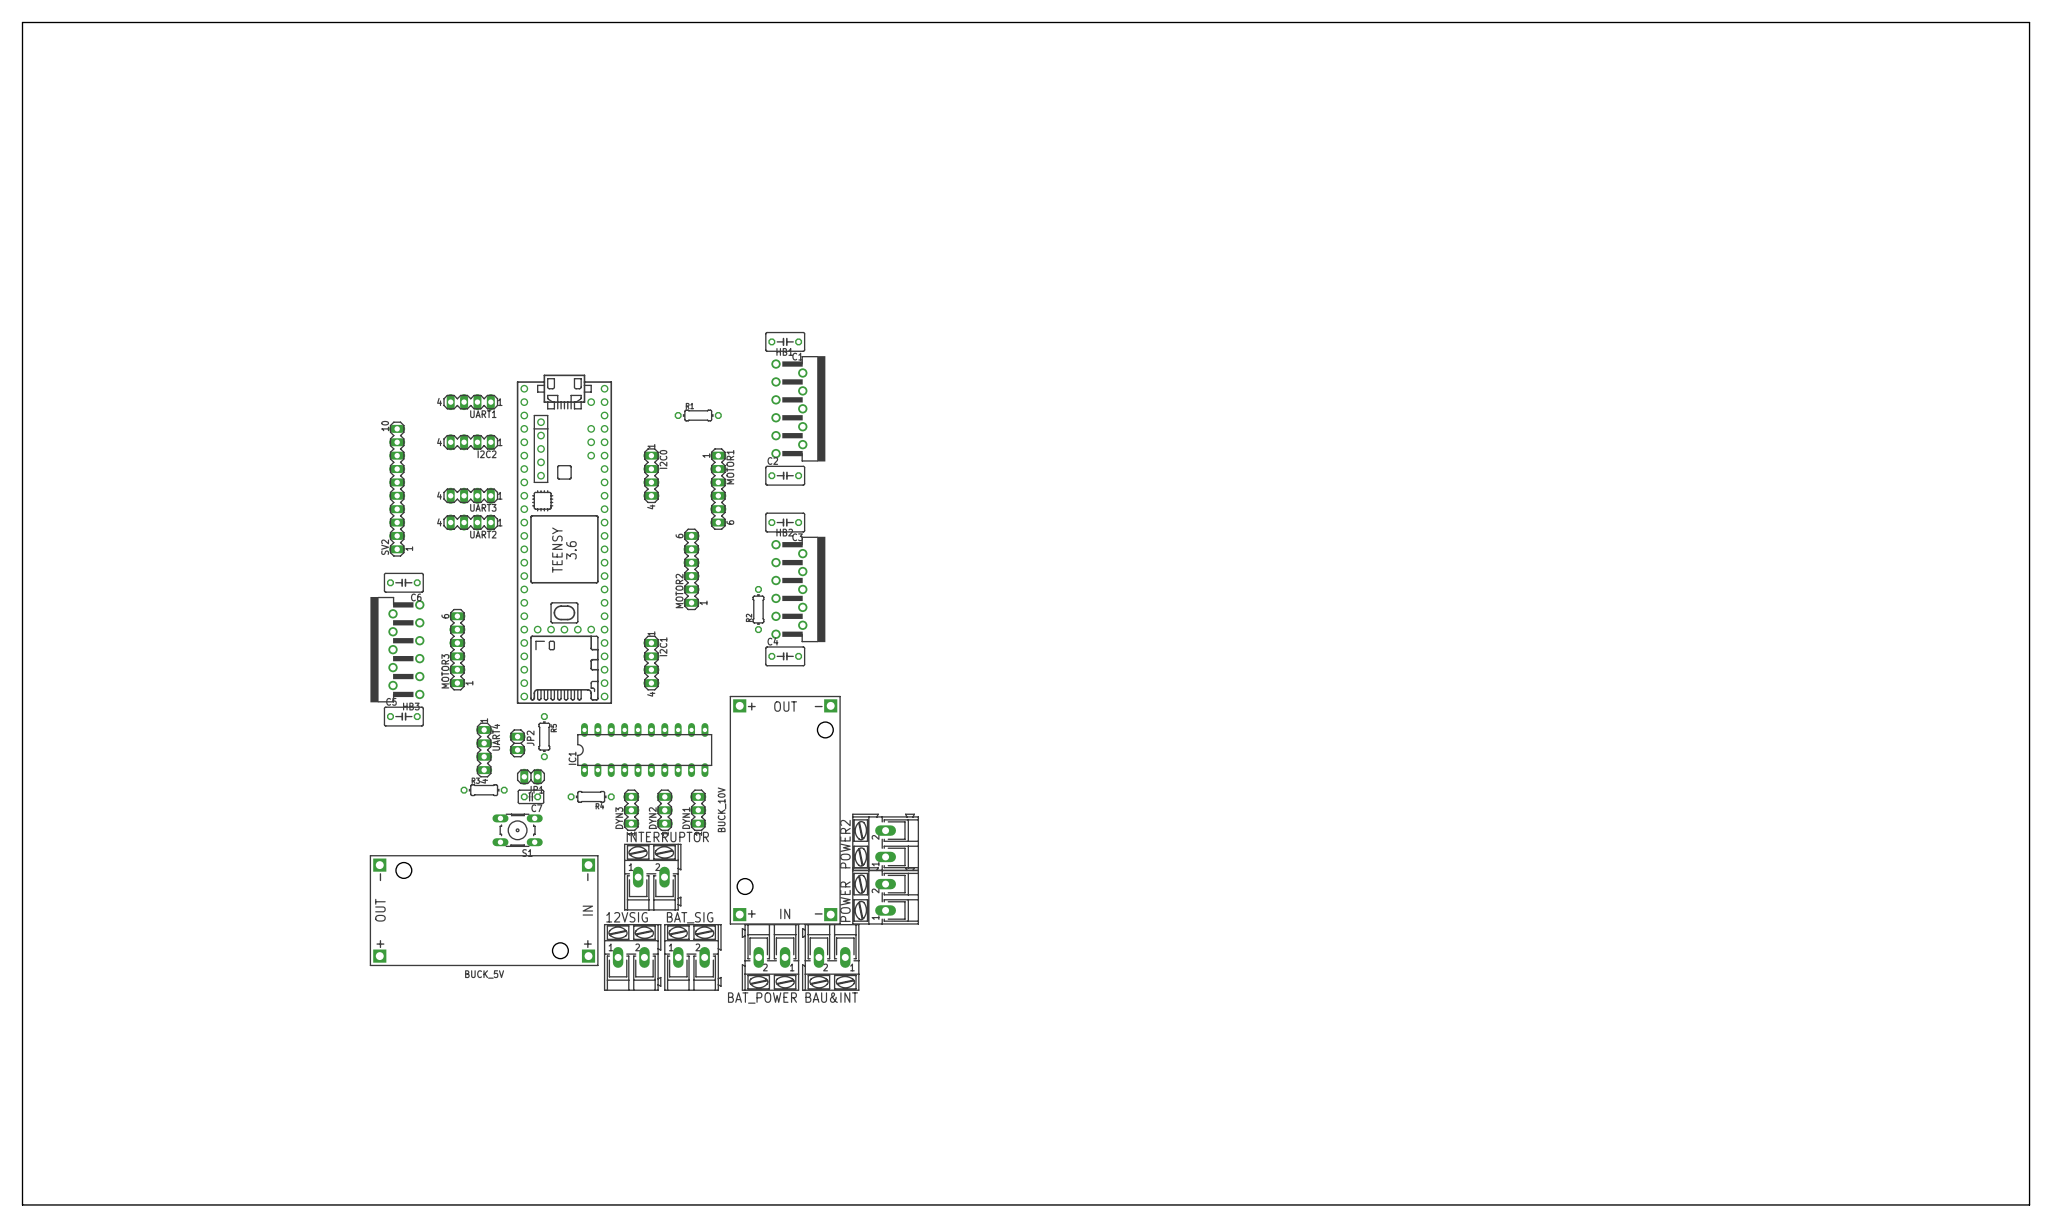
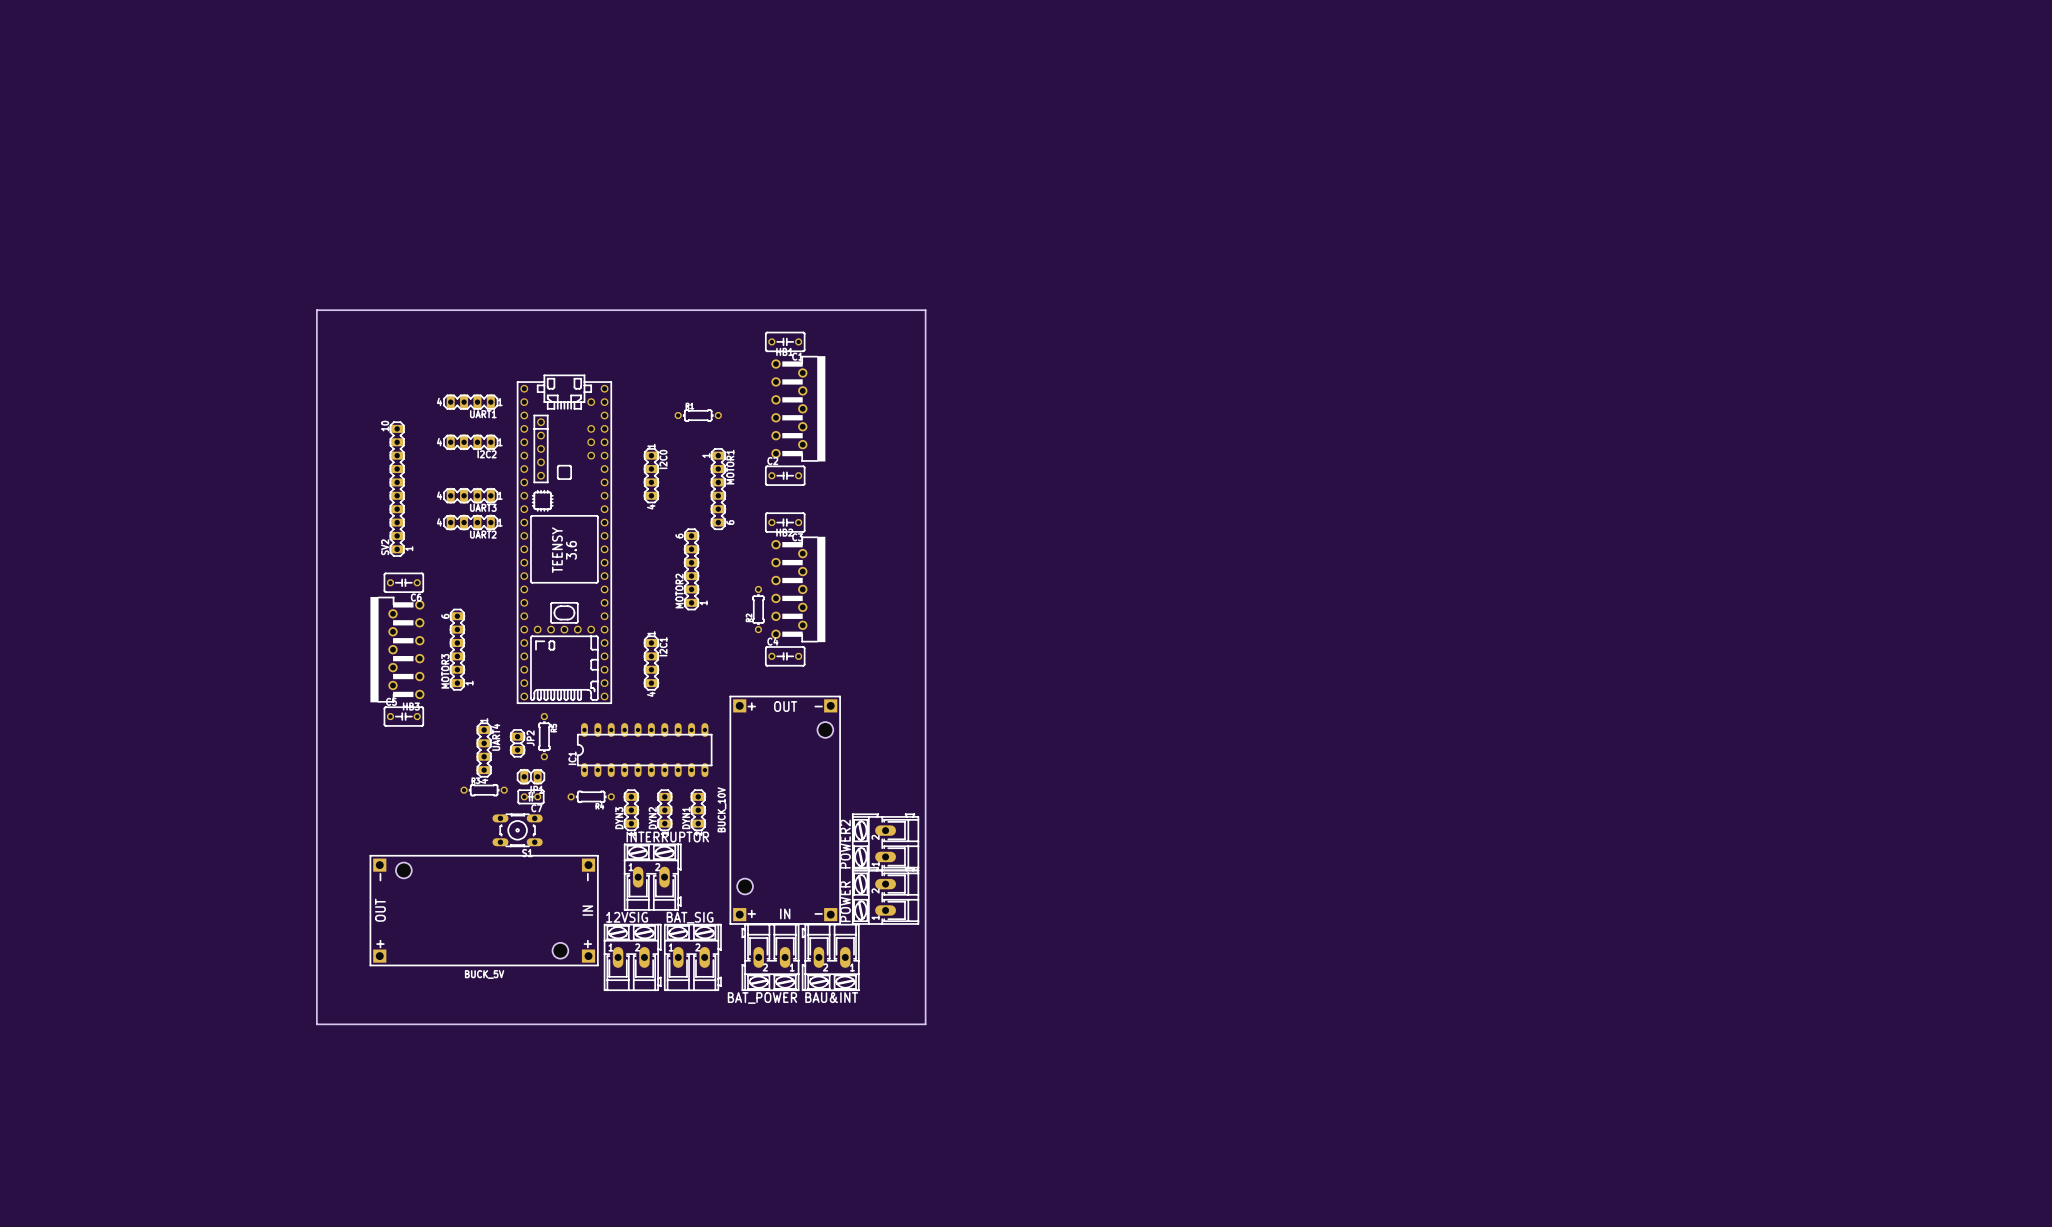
board edge: (22, 22) (2029, 22) (2029, 1204) (22, 1204) (22, 22) -> none
board edge: none -> (316, 310) (925, 310) (925, 1024) (316, 1024) (316, 310)

